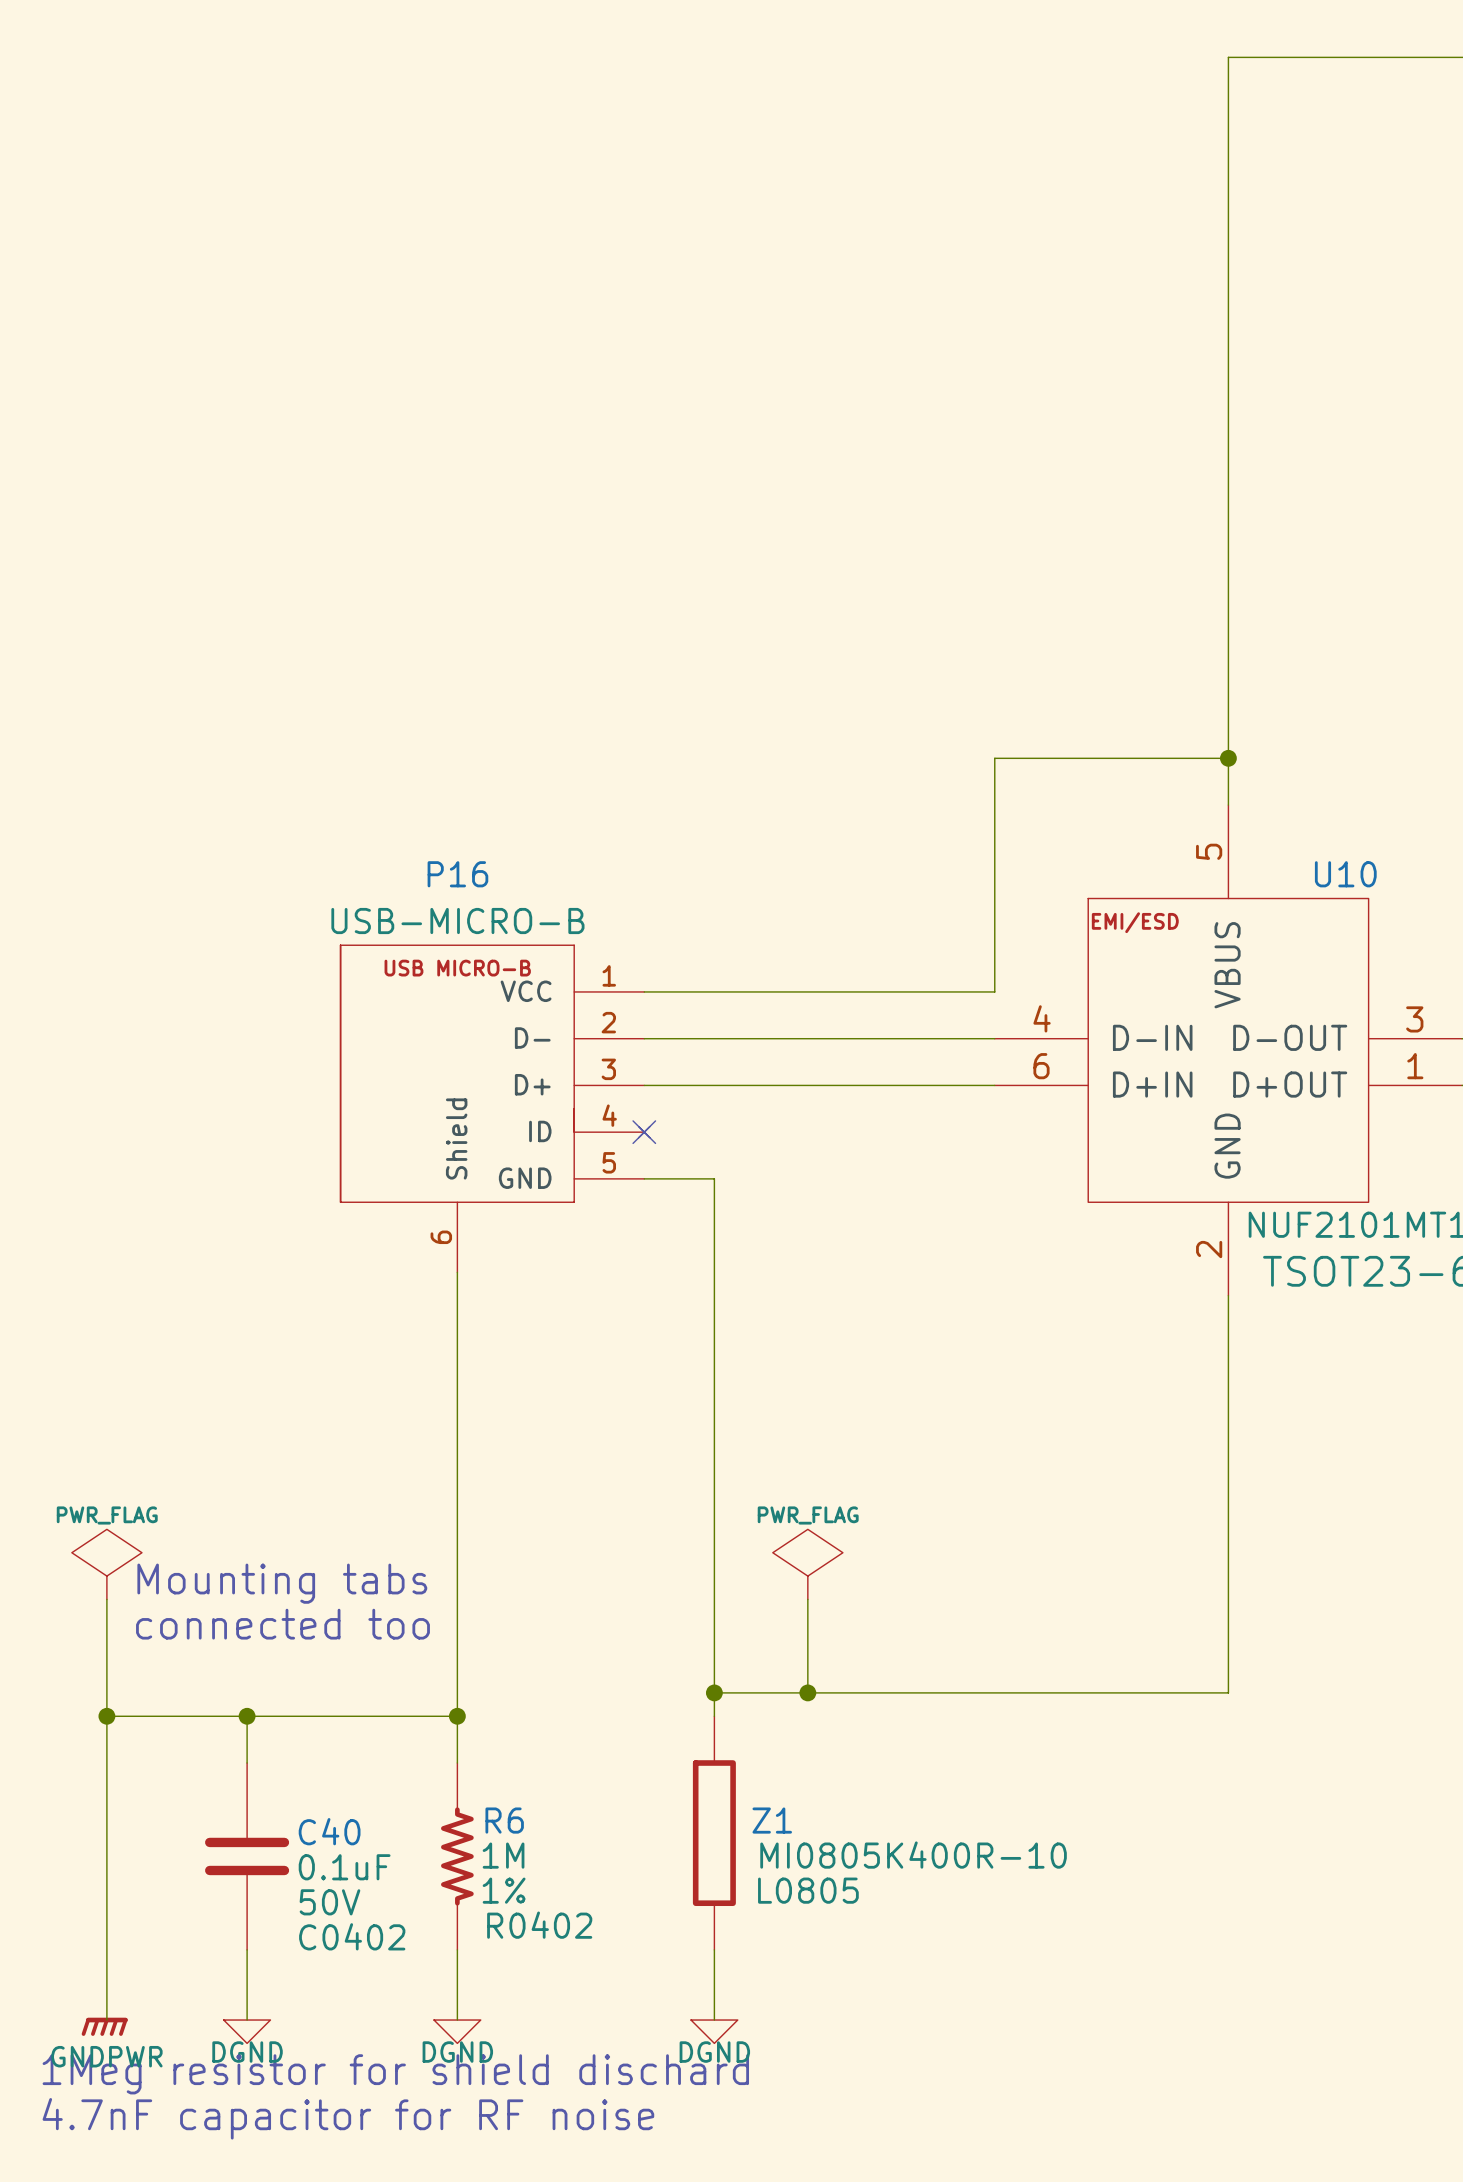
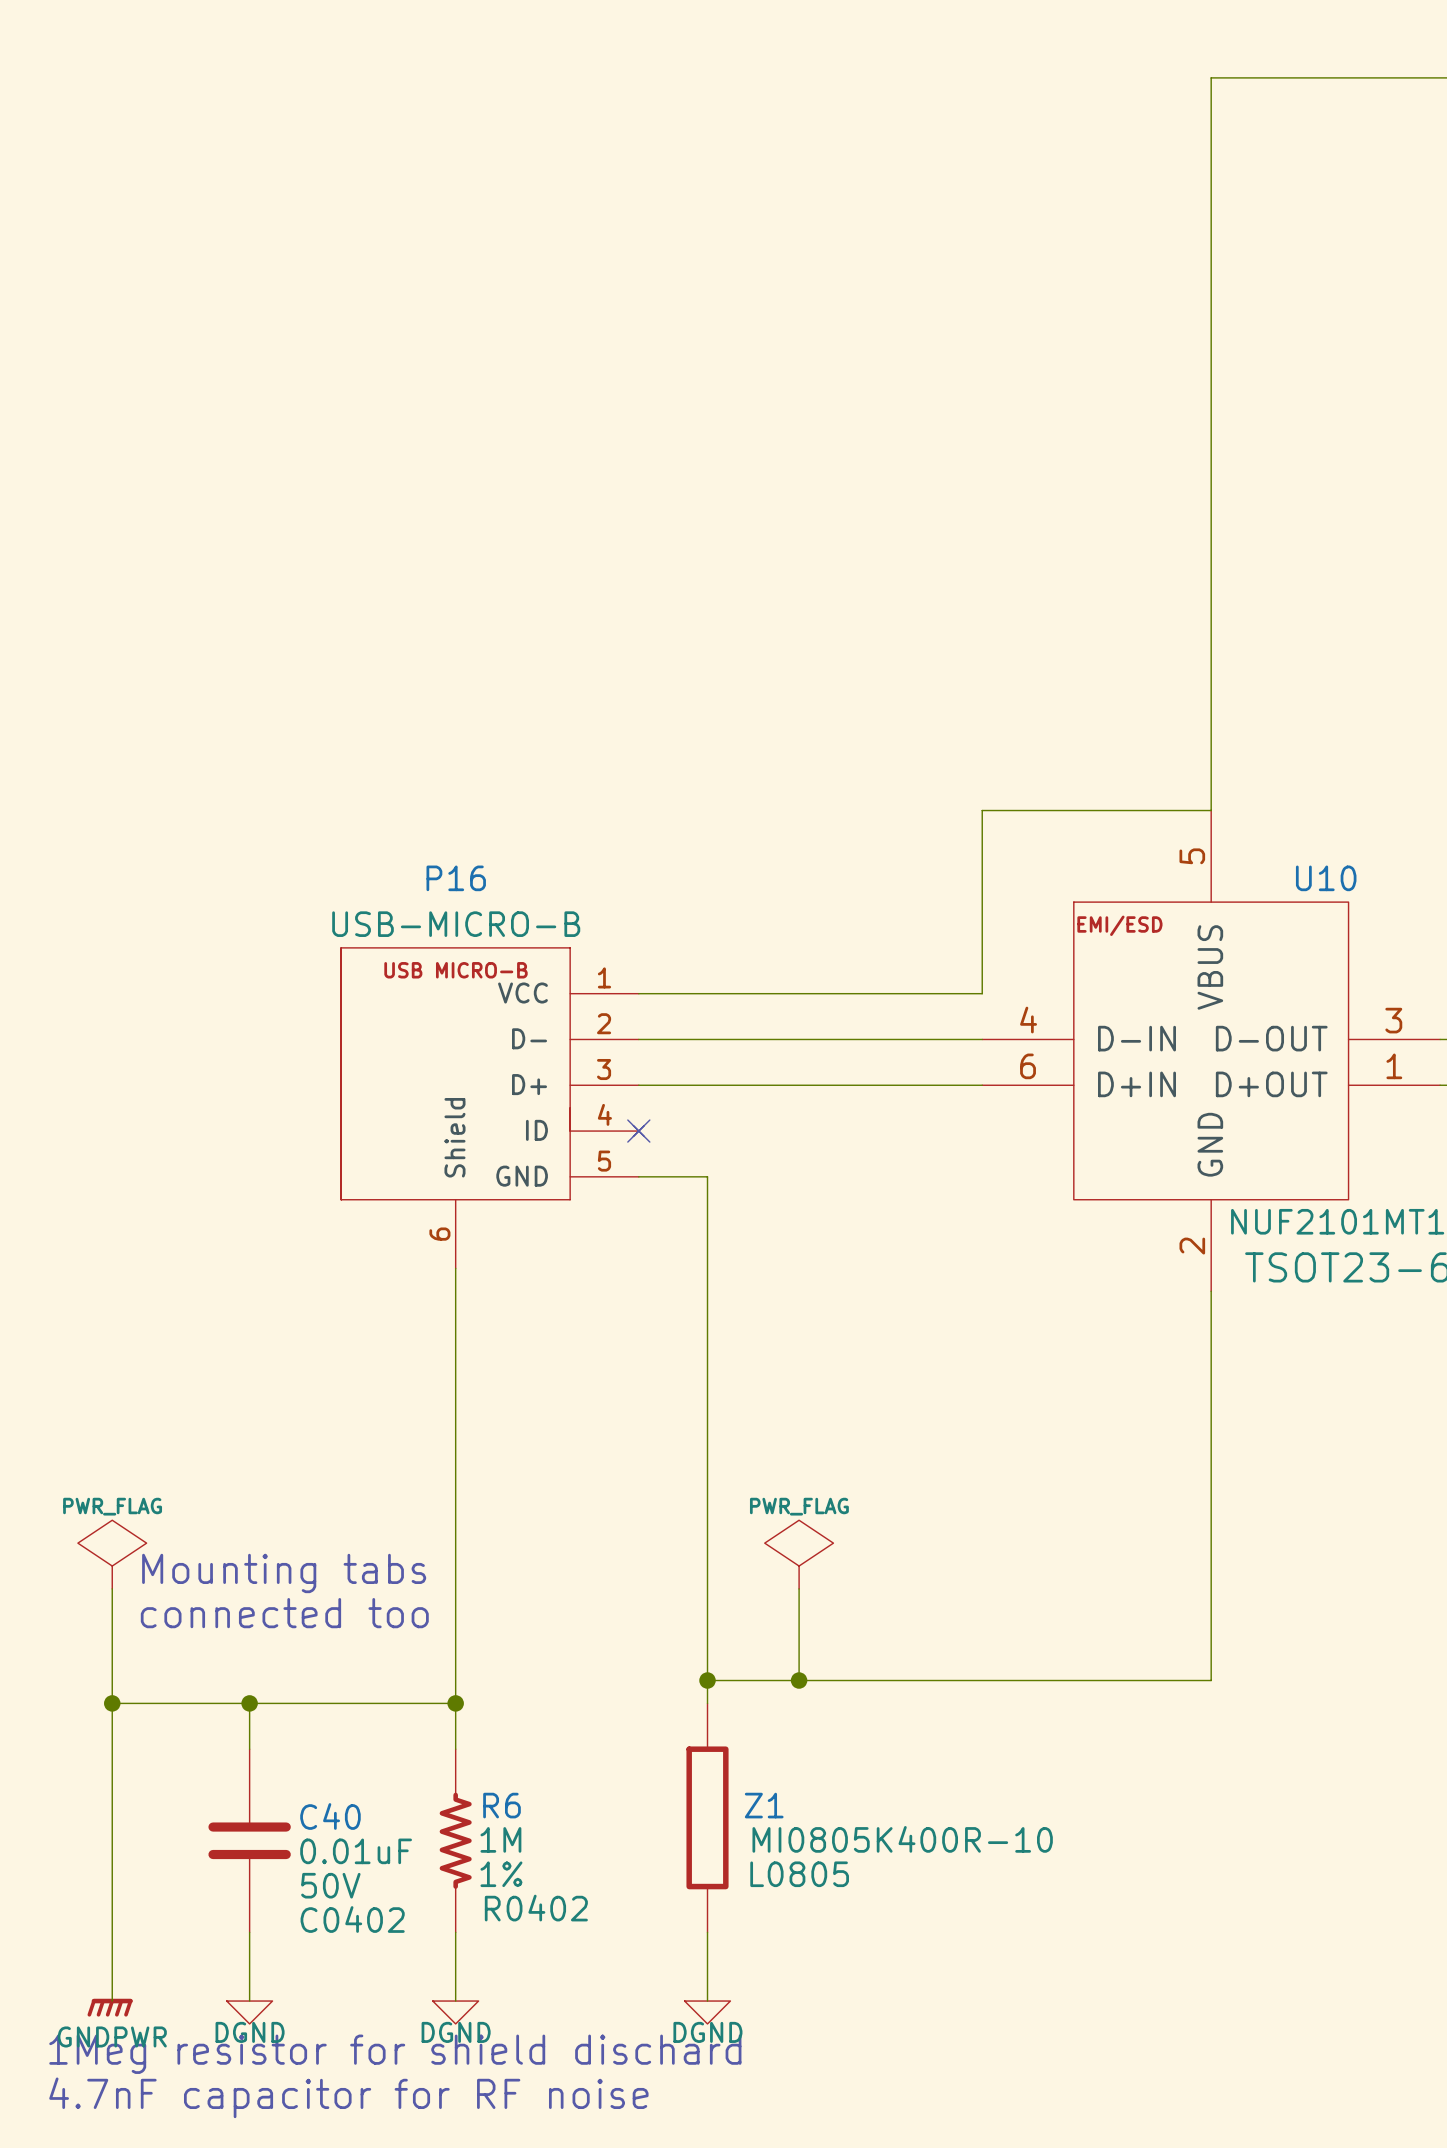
wire: (1228, 758) (994, 758) (994, 805) -> (1211, 810) (982, 810)
junction: (1228, 758) -> none
C40 value: 0.1uF (344, 1867) -> 0.01uF (356, 1851)

